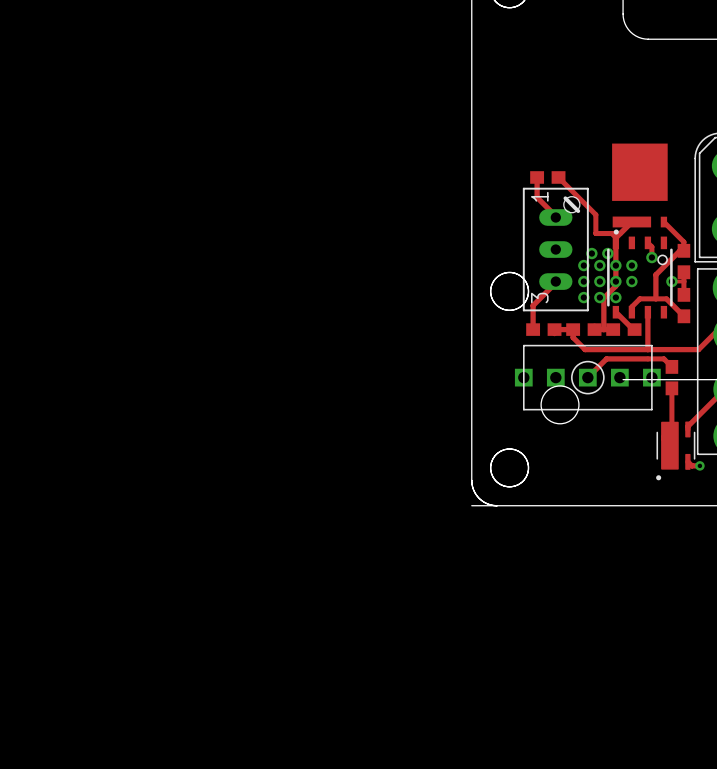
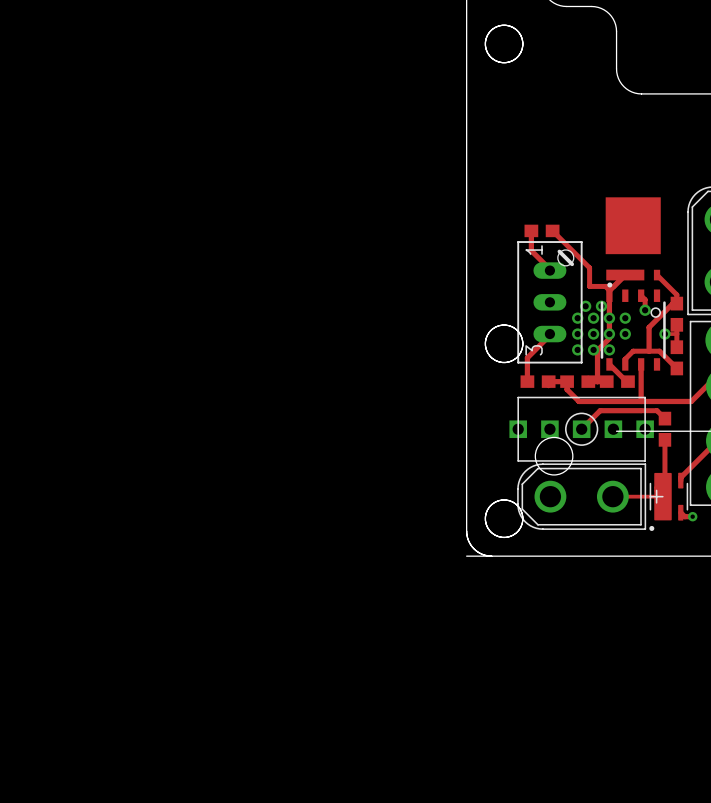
part: none -> (590, 496)
track: none -> (612, 496) (662, 496)

